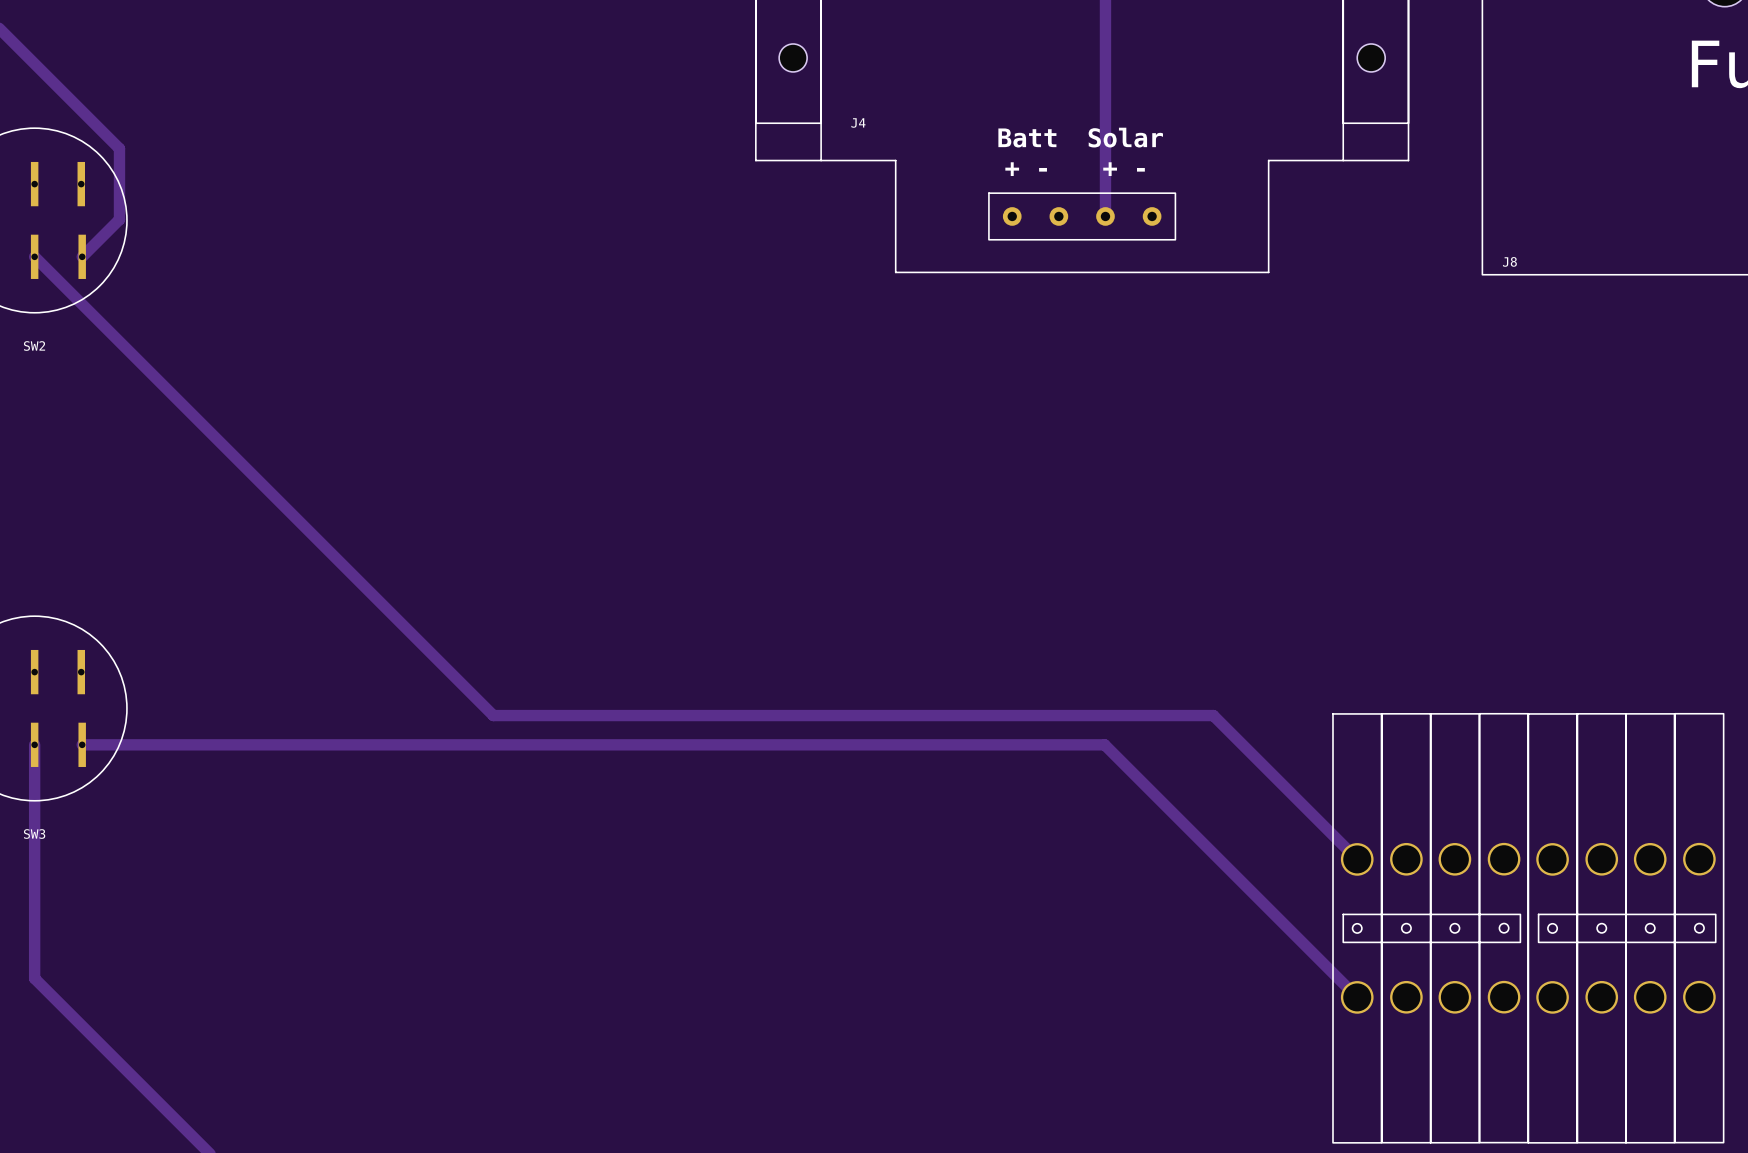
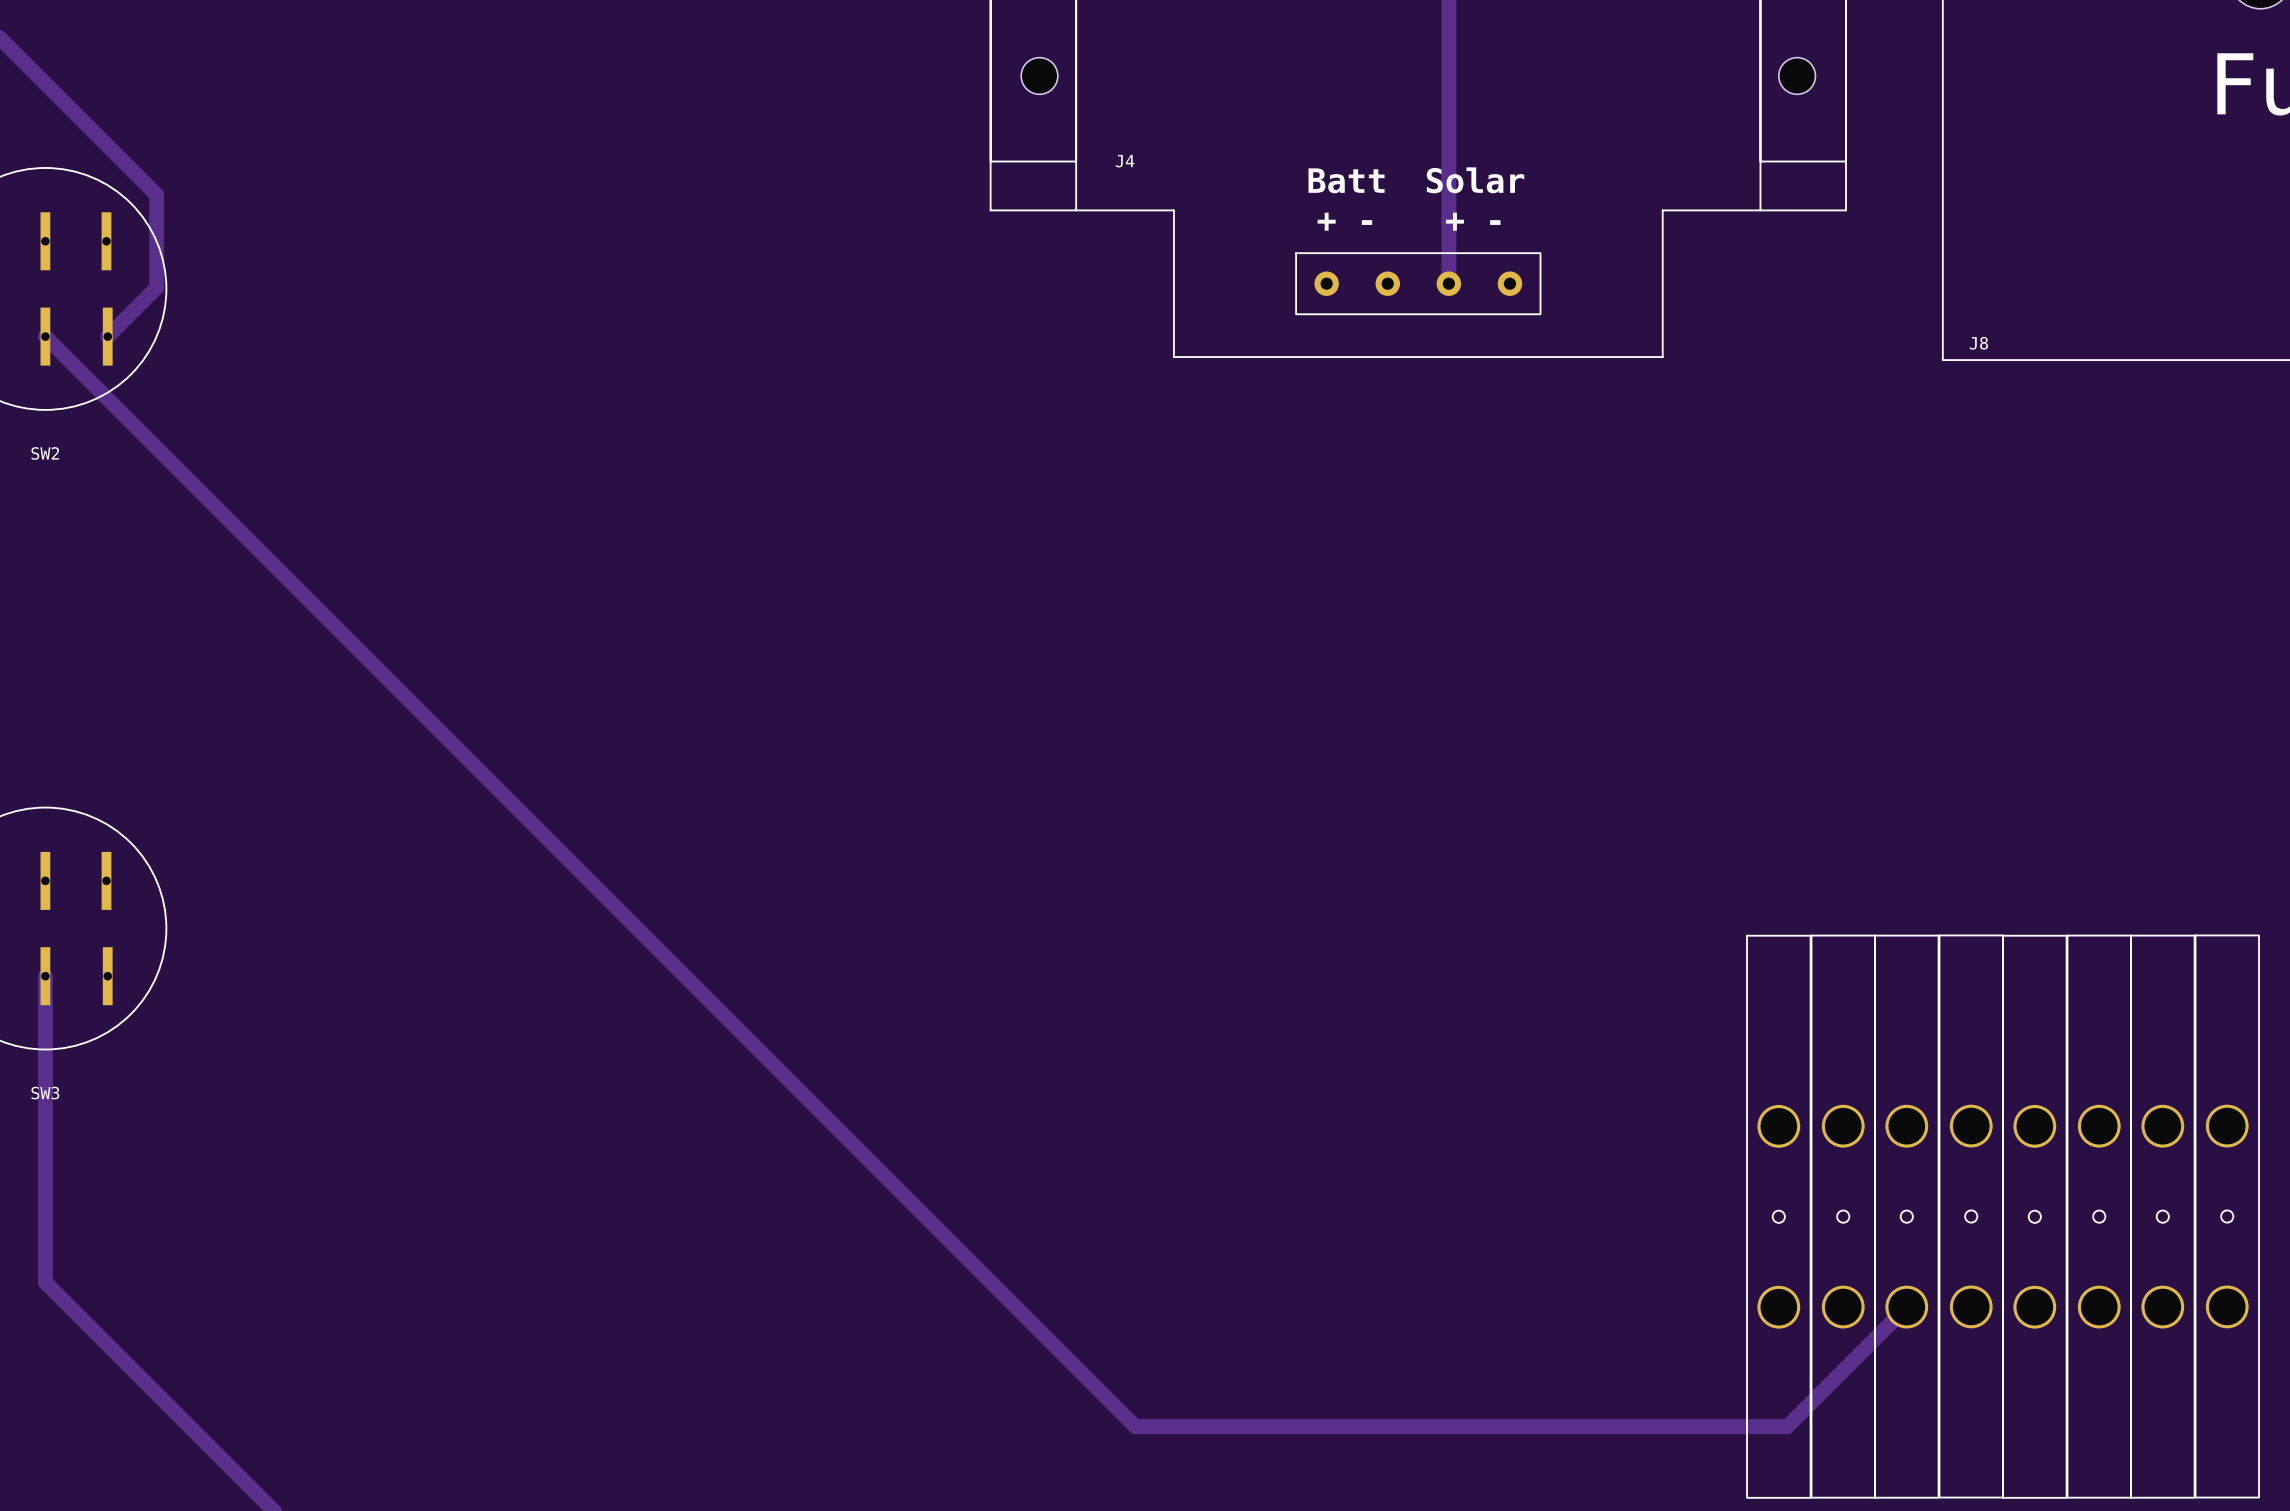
part footprint: [1332, 713, 1530, 1144] -> [1746, 934, 2004, 1499]
part footprint: [1527, 713, 1725, 1144] -> [2002, 934, 2260, 1499]
track: (493, 715) (1213, 715) (1357, 859) -> (646, 937) (1135, 1426) (1787, 1426) (1906, 1307)
track: (82, 744) (1104, 744) (1357, 997) -> none

